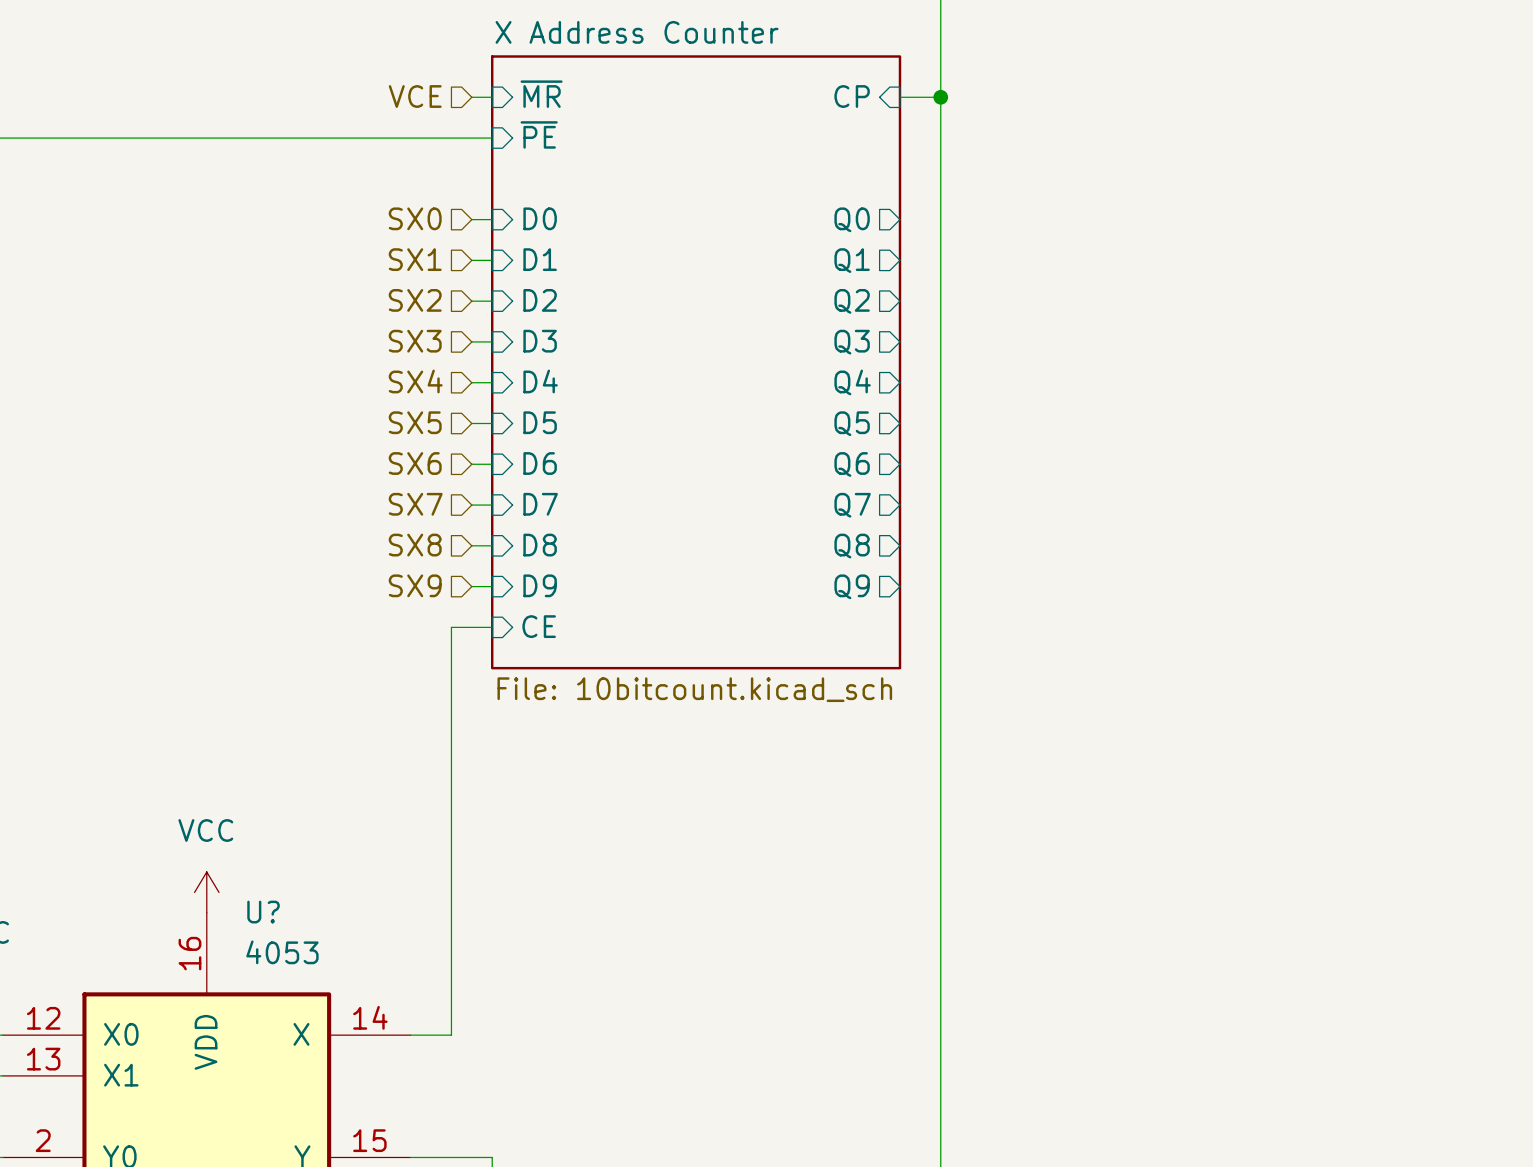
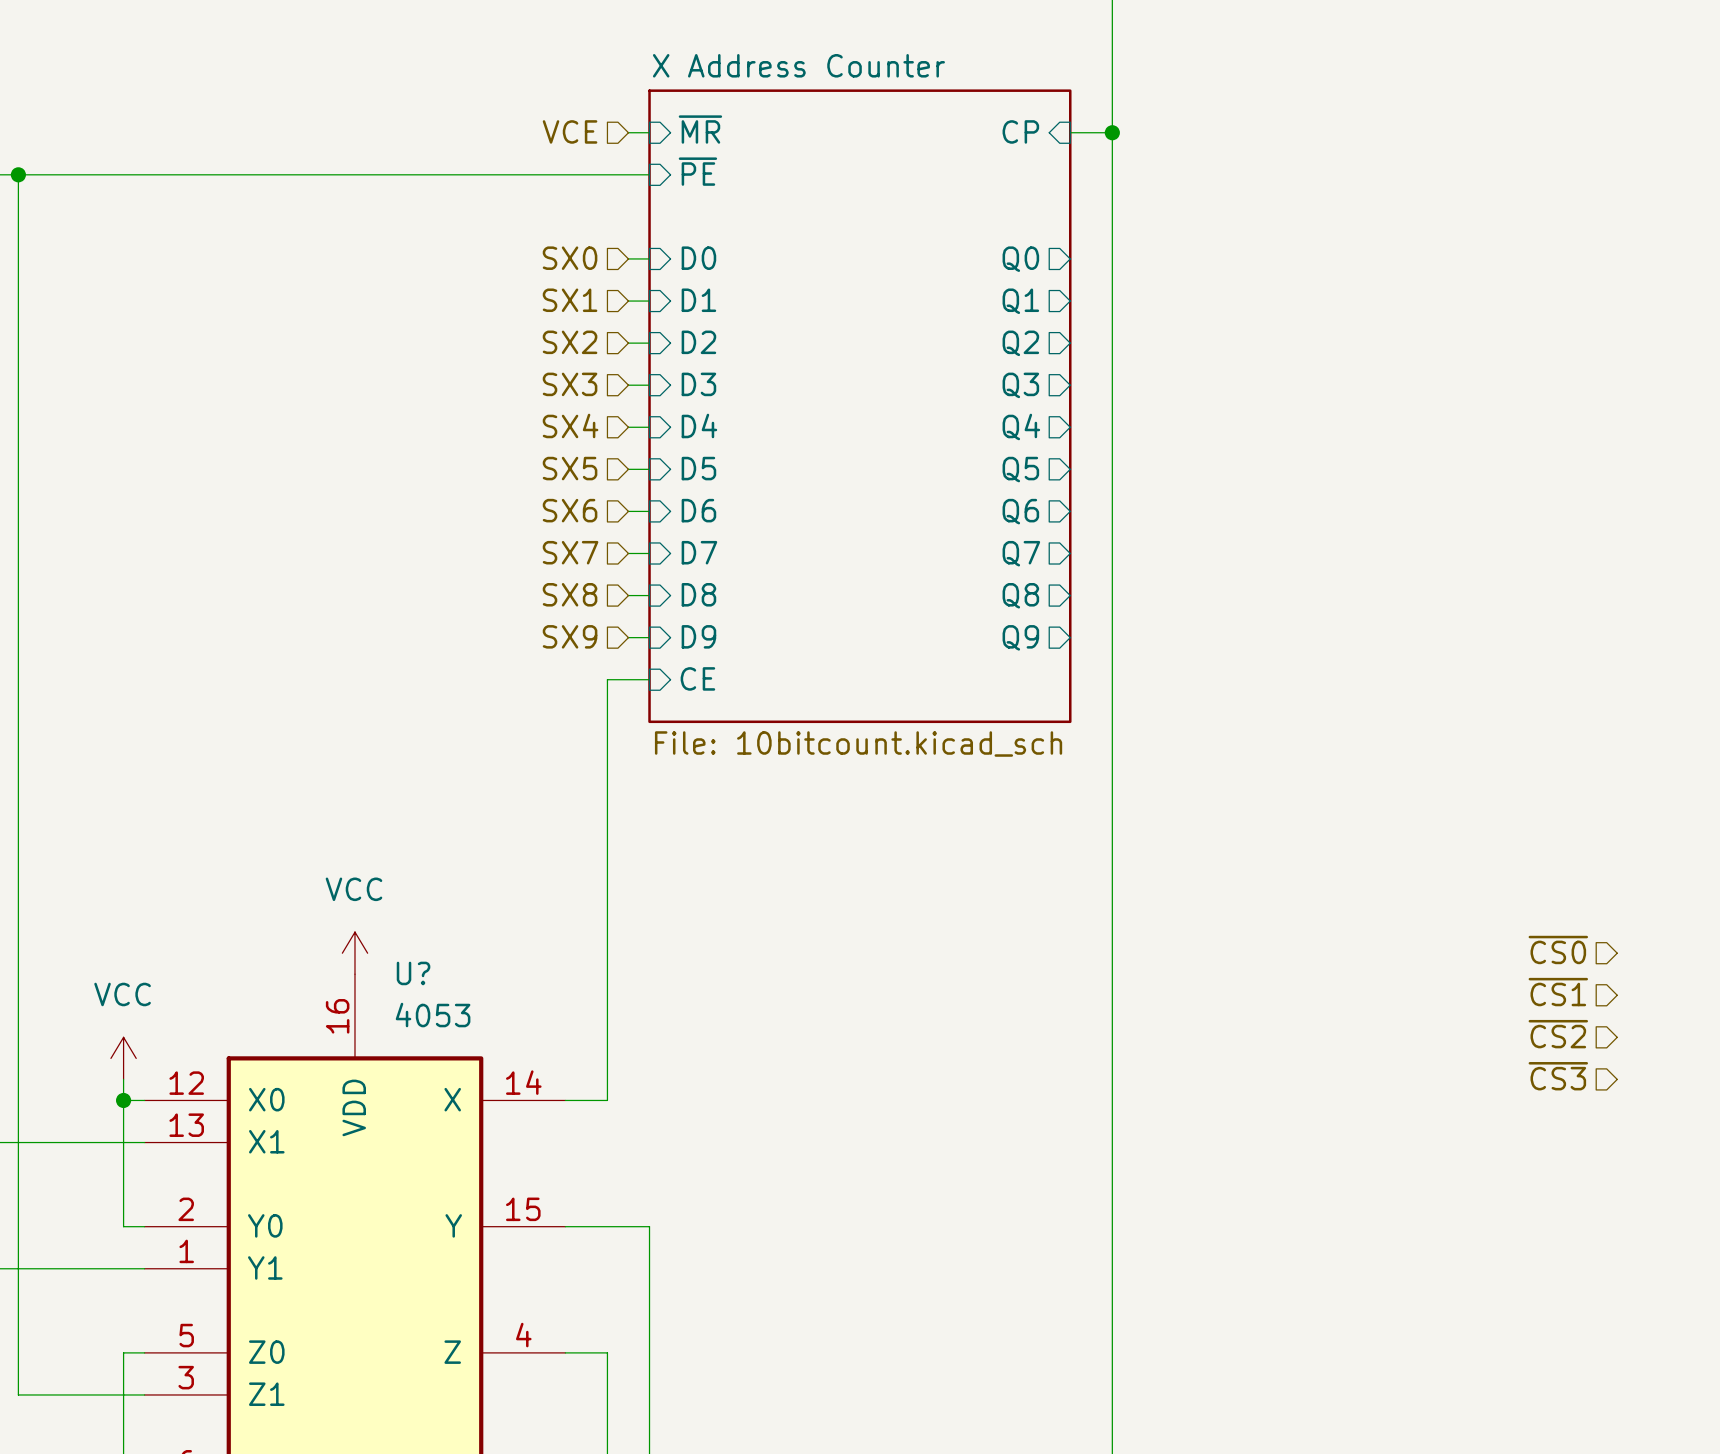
hierarchical label: none -> ~{CS0} (1558, 949)
hierarchical label: none -> ~{CS1} (1558, 992)
hierarchical label: none -> ~{CS2} (1558, 1034)
hierarchical label: none -> ~{CS3} (1558, 1076)

